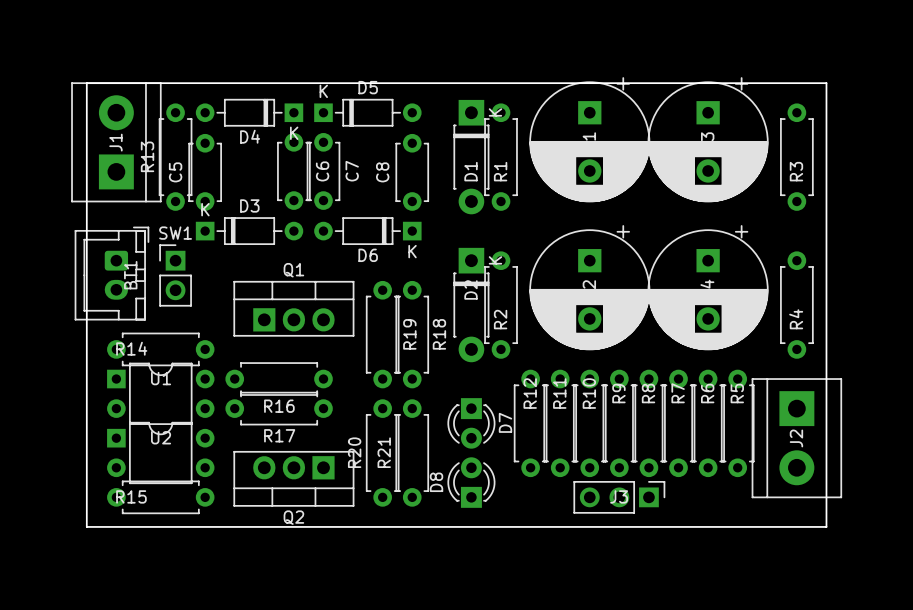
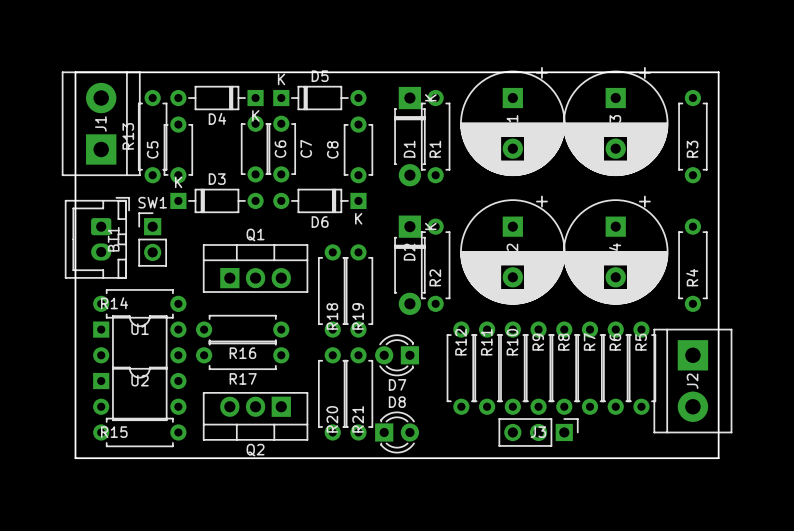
R19 name: R19 (409, 334) -> R18 (332, 316)
R18 name: R18 (439, 334) -> R19 (358, 316)
D7 rotation: 0° (471, 423) -> 90° clockwise (397, 355)
R20 name position: R20 (354, 452) -> R20 (332, 419)
R21 name position: R21 (384, 452) -> R21 (358, 419)
D8 rotation: 0° (471, 482) -> 90° clockwise (397, 432)

